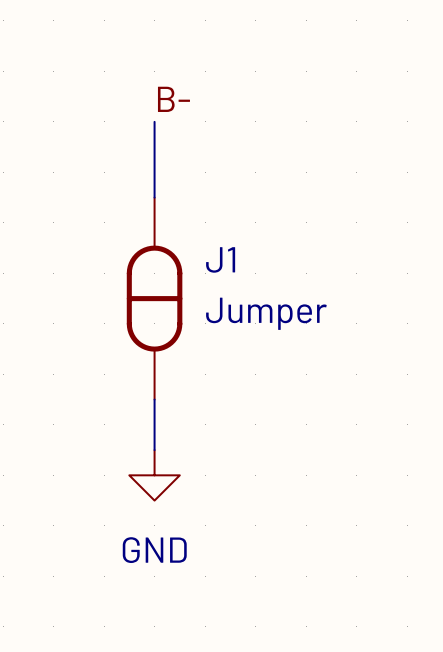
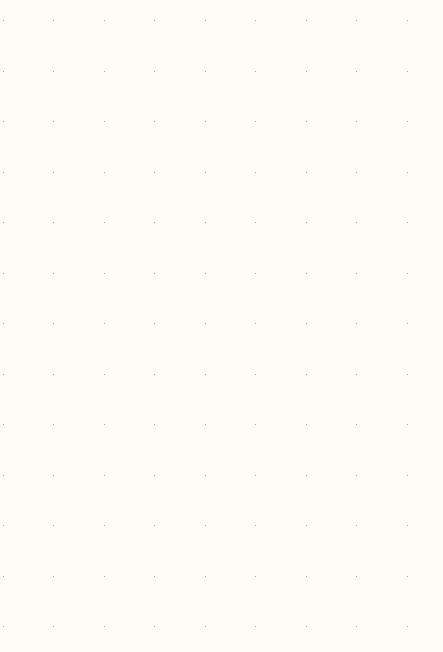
label: B- (173, 99) -> none
wire: (154, 121) (154, 197) -> none
J1: Jumper (154, 298) -> none
wire: (154, 399) (154, 450) -> none
power symbol: GND (154, 475) -> none

